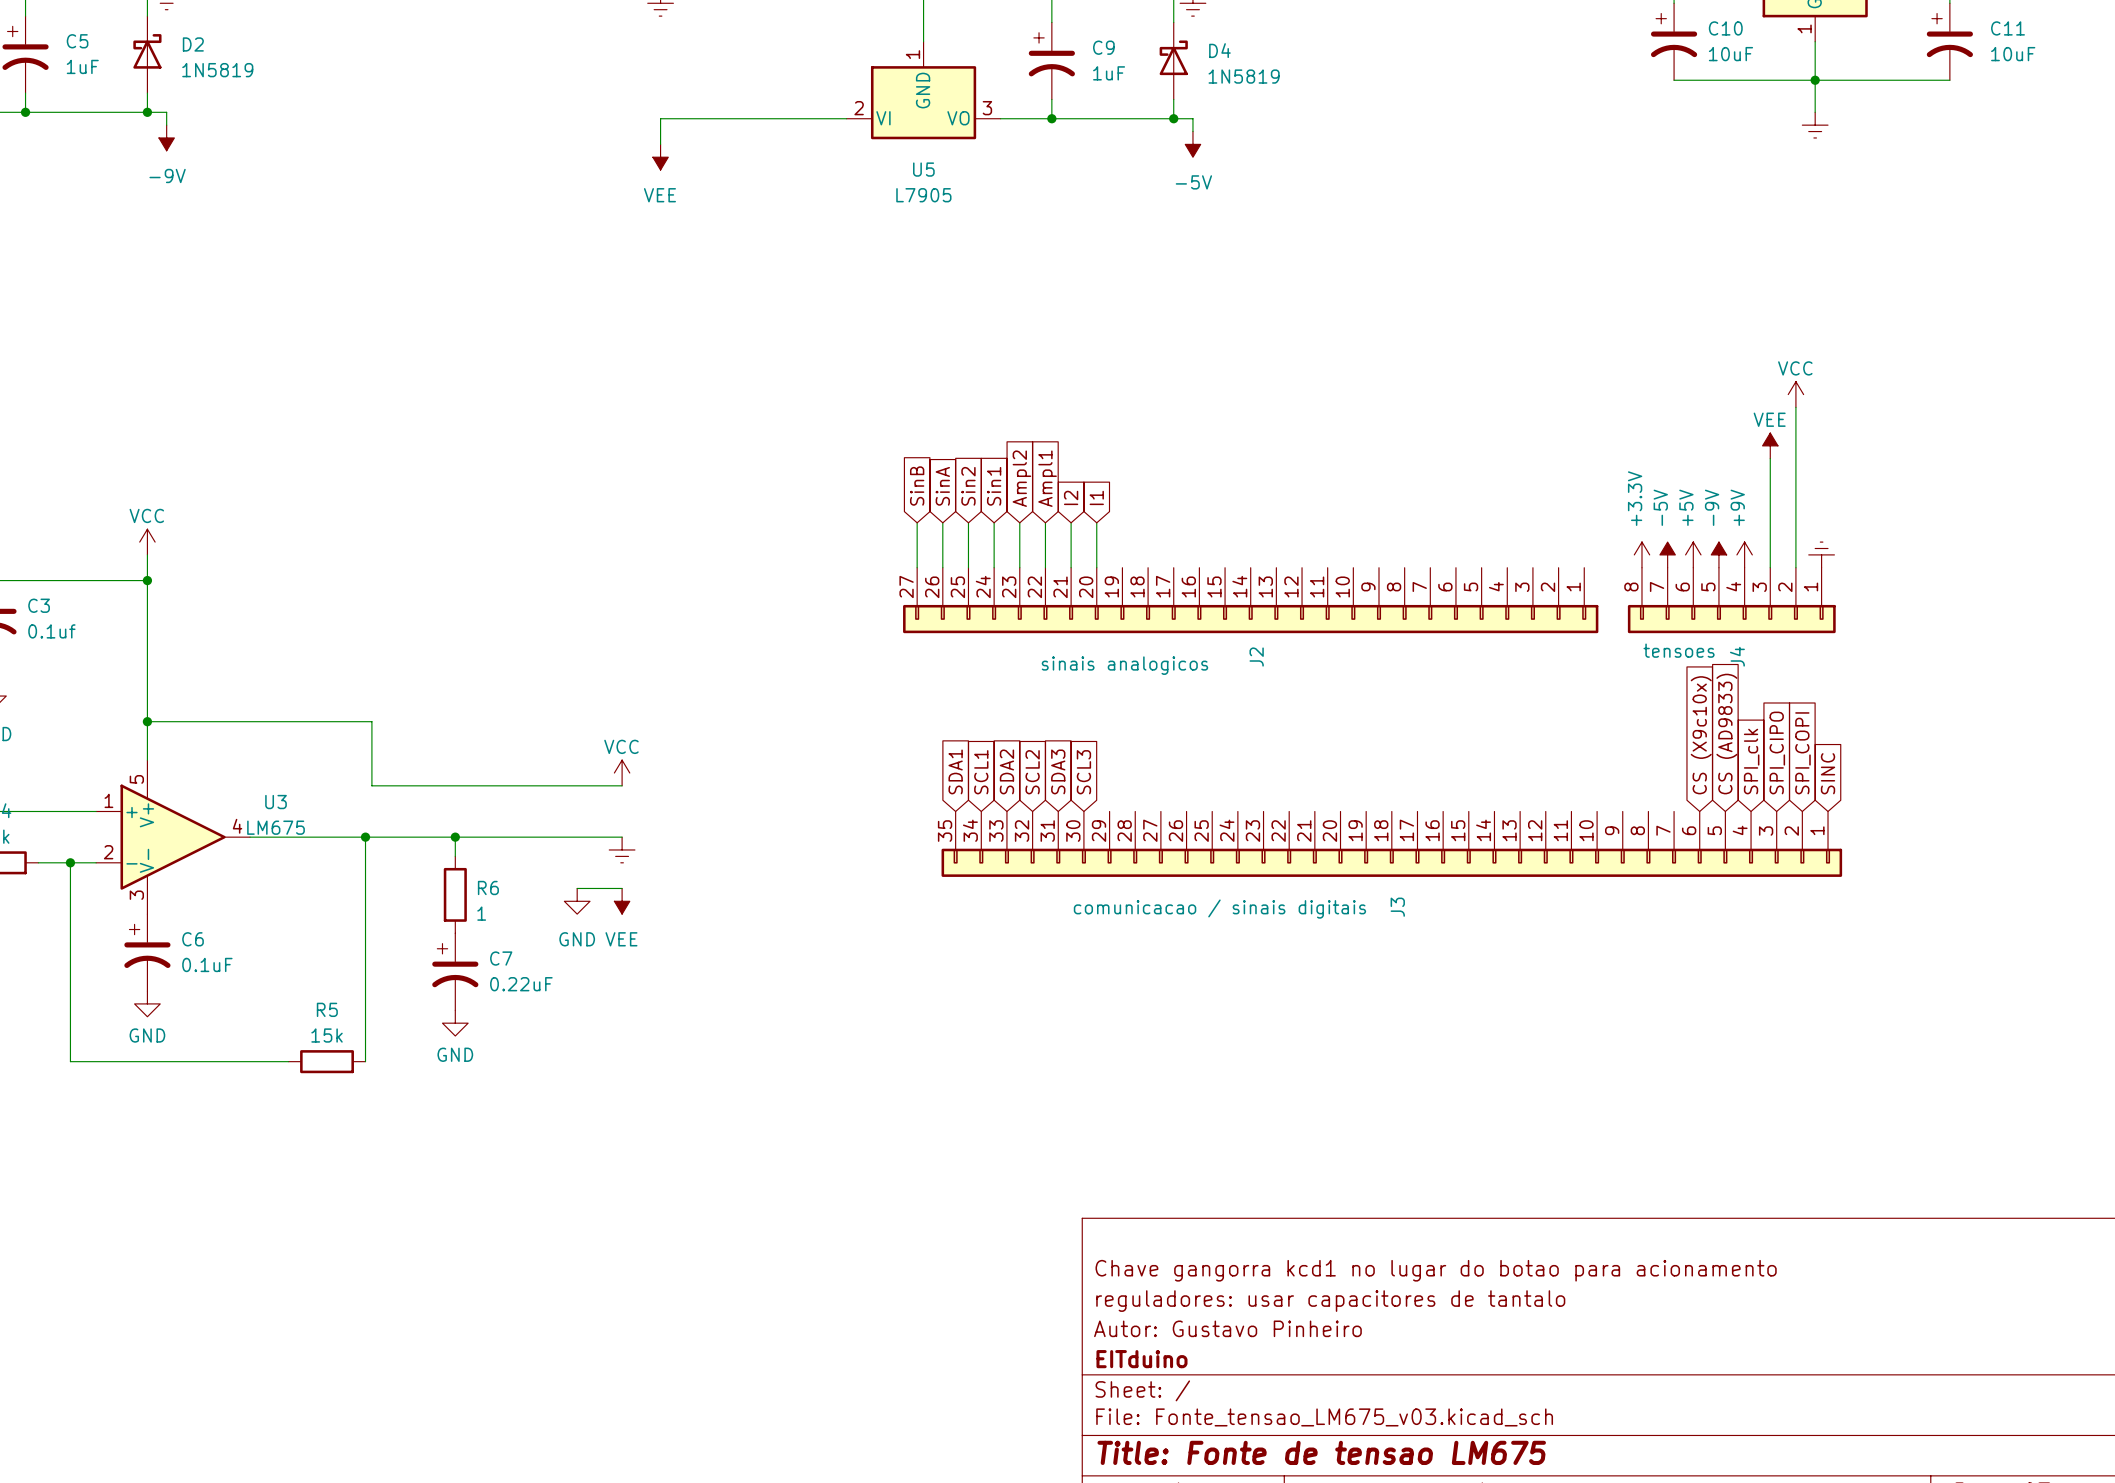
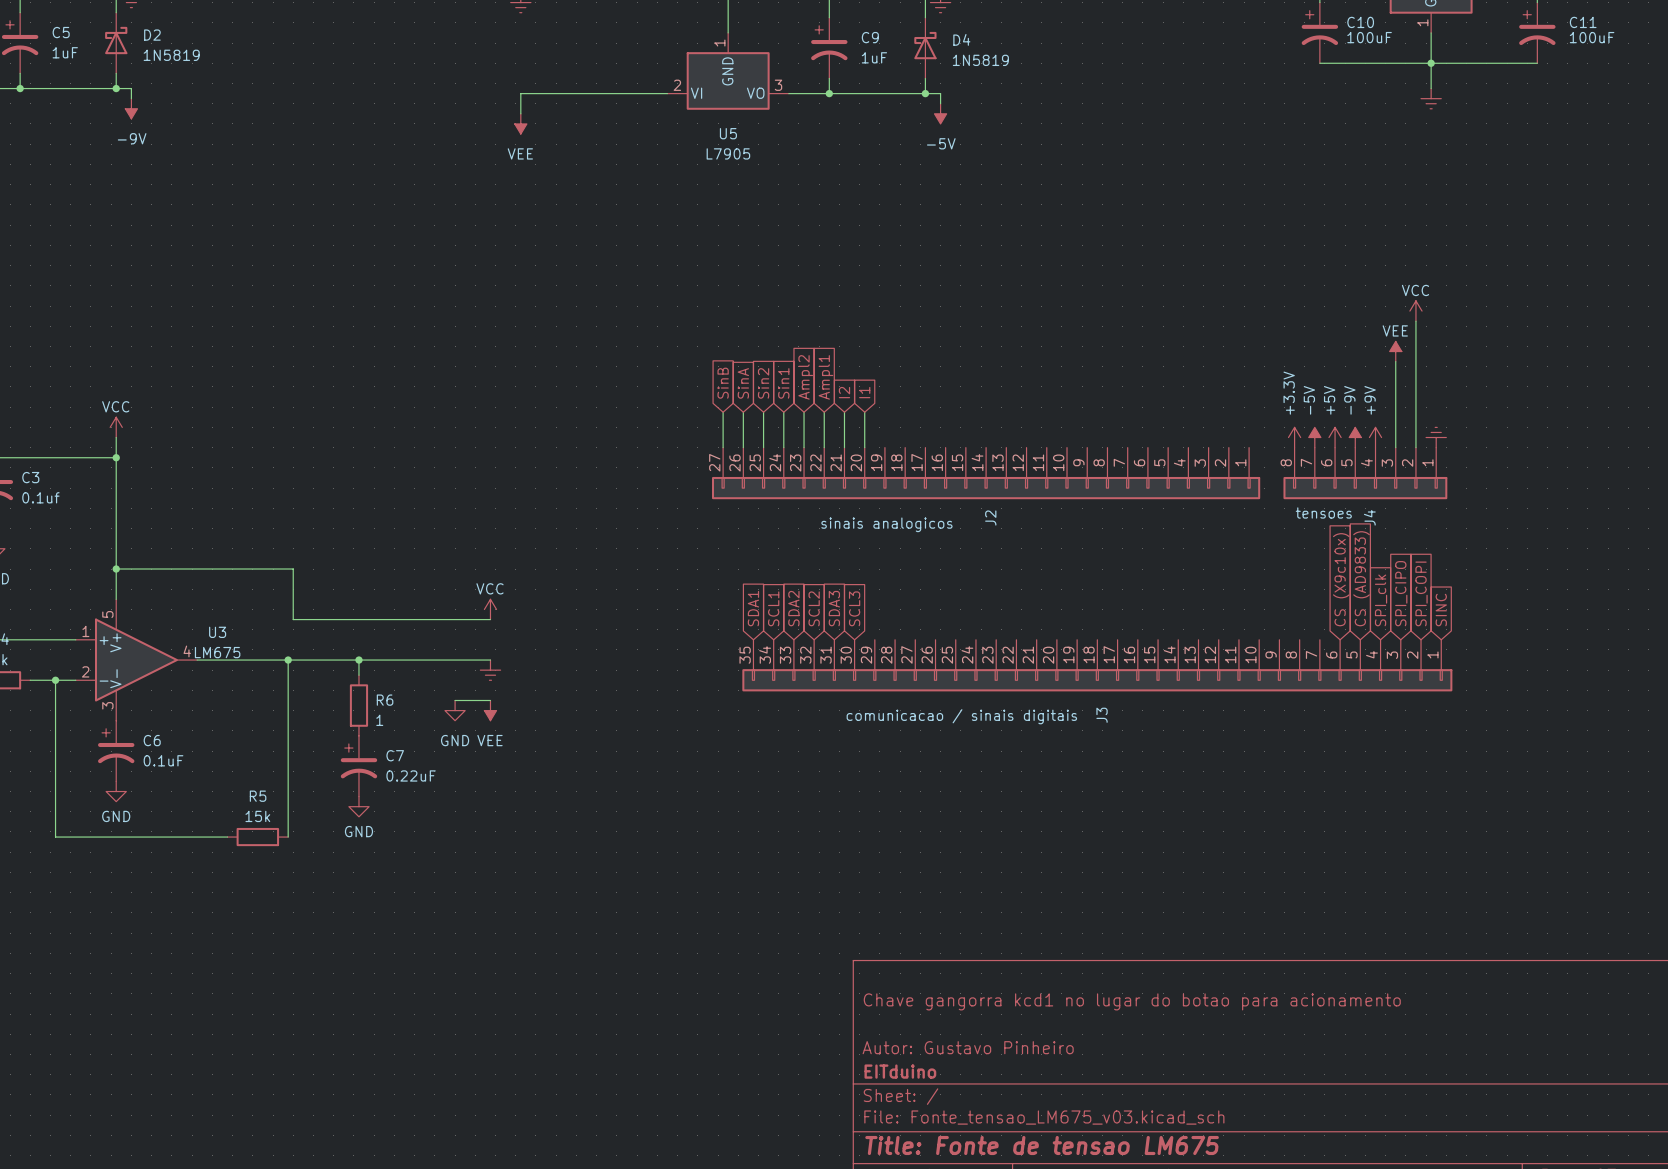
C10 value: 10uF (1730, 54) -> 100uF (1369, 37)
C11 value: 10uF (2013, 54) -> 100uF (1592, 37)
title block: reguladores: usar capacitores de tantalo (1330, 1301) -> none

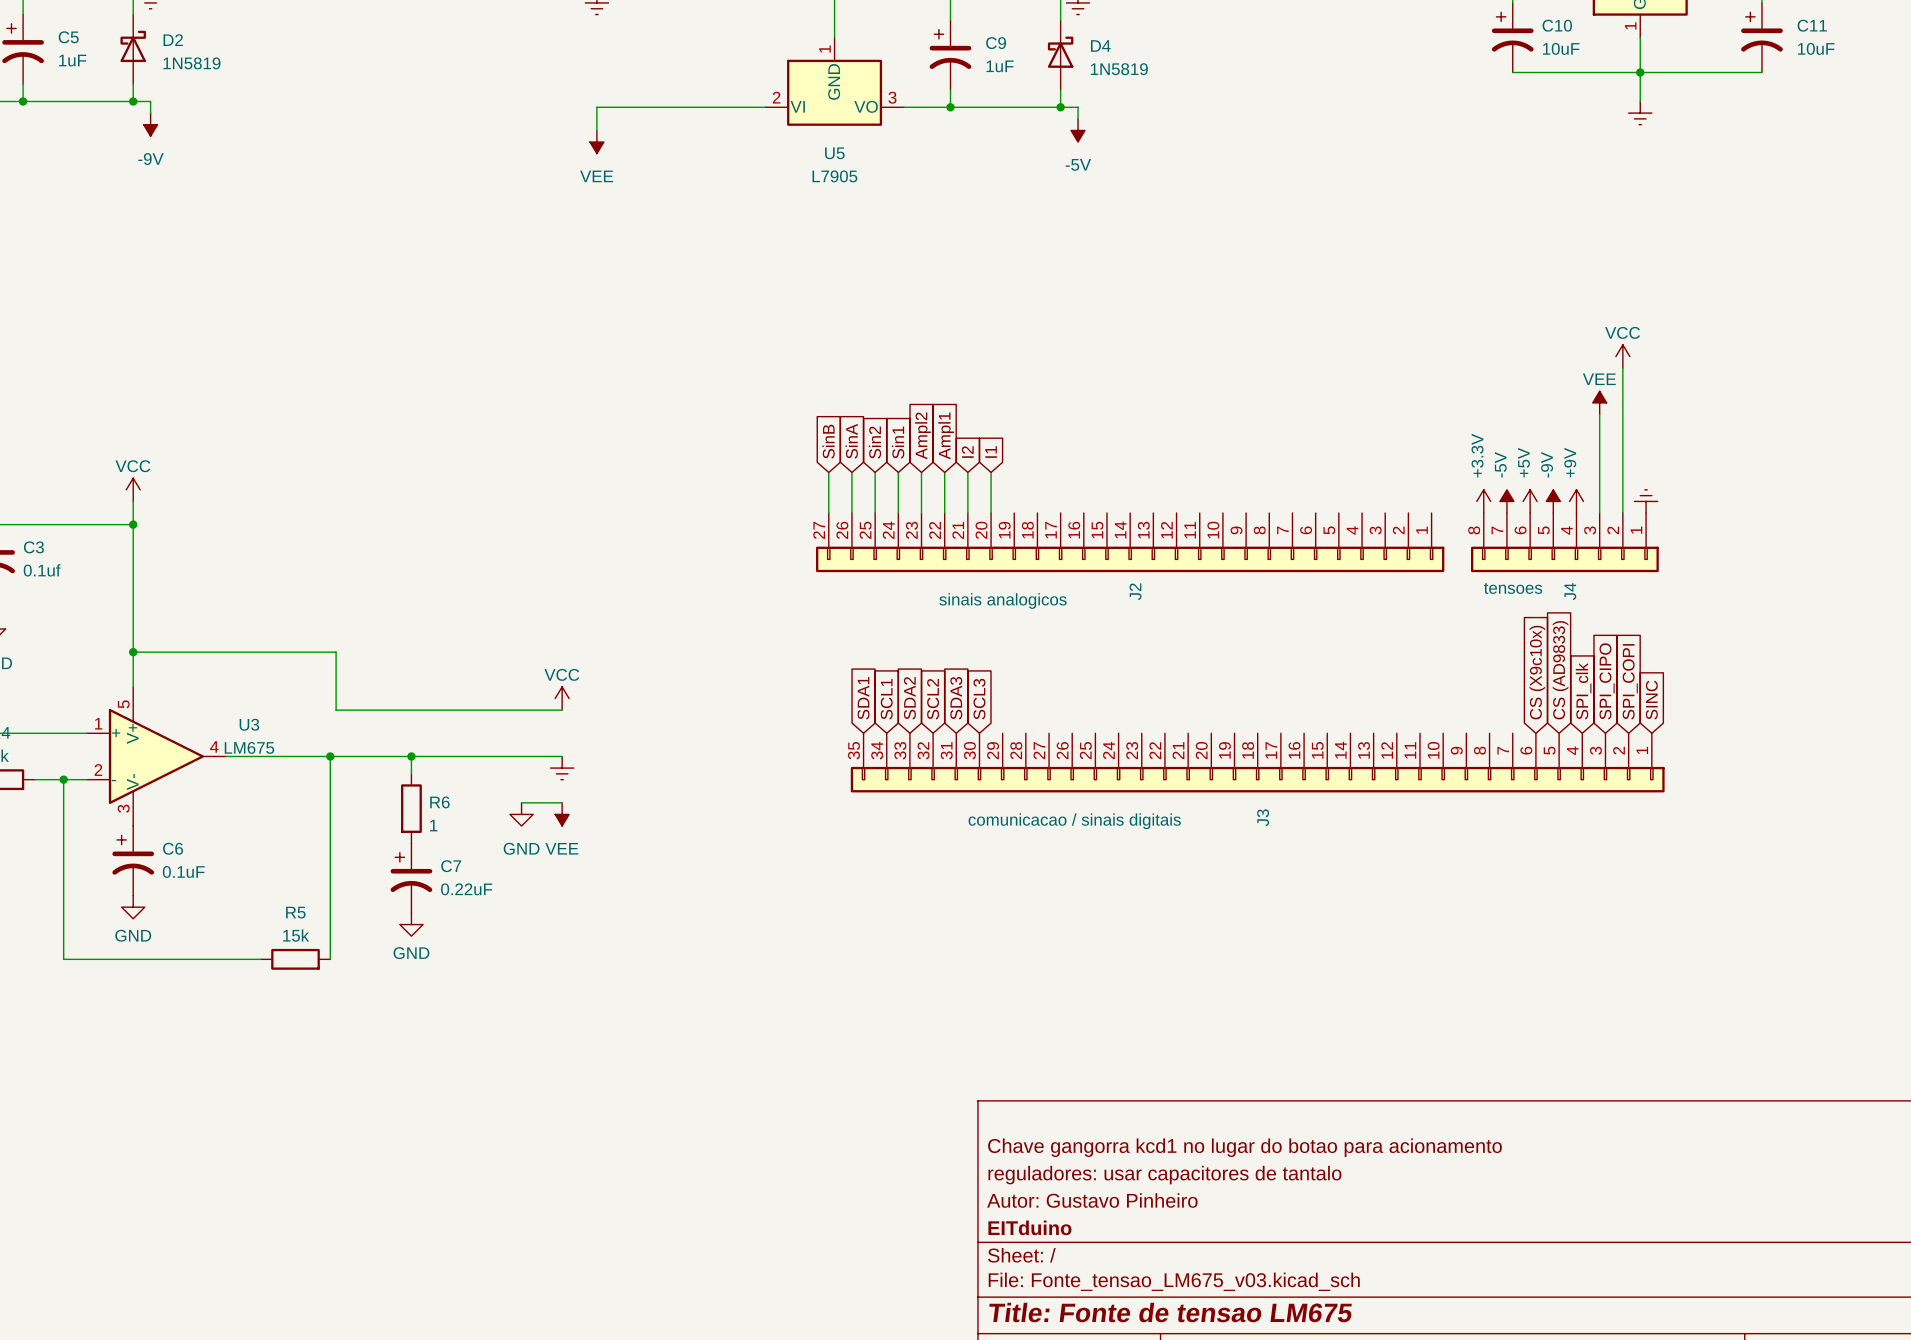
C10 value: 100uF (1369, 37) -> 10uF (1561, 48)
C11 value: 100uF (1592, 37) -> 10uF (1816, 48)
title block: none -> reguladores: usar capacitores de tantalo (1164, 1175)

